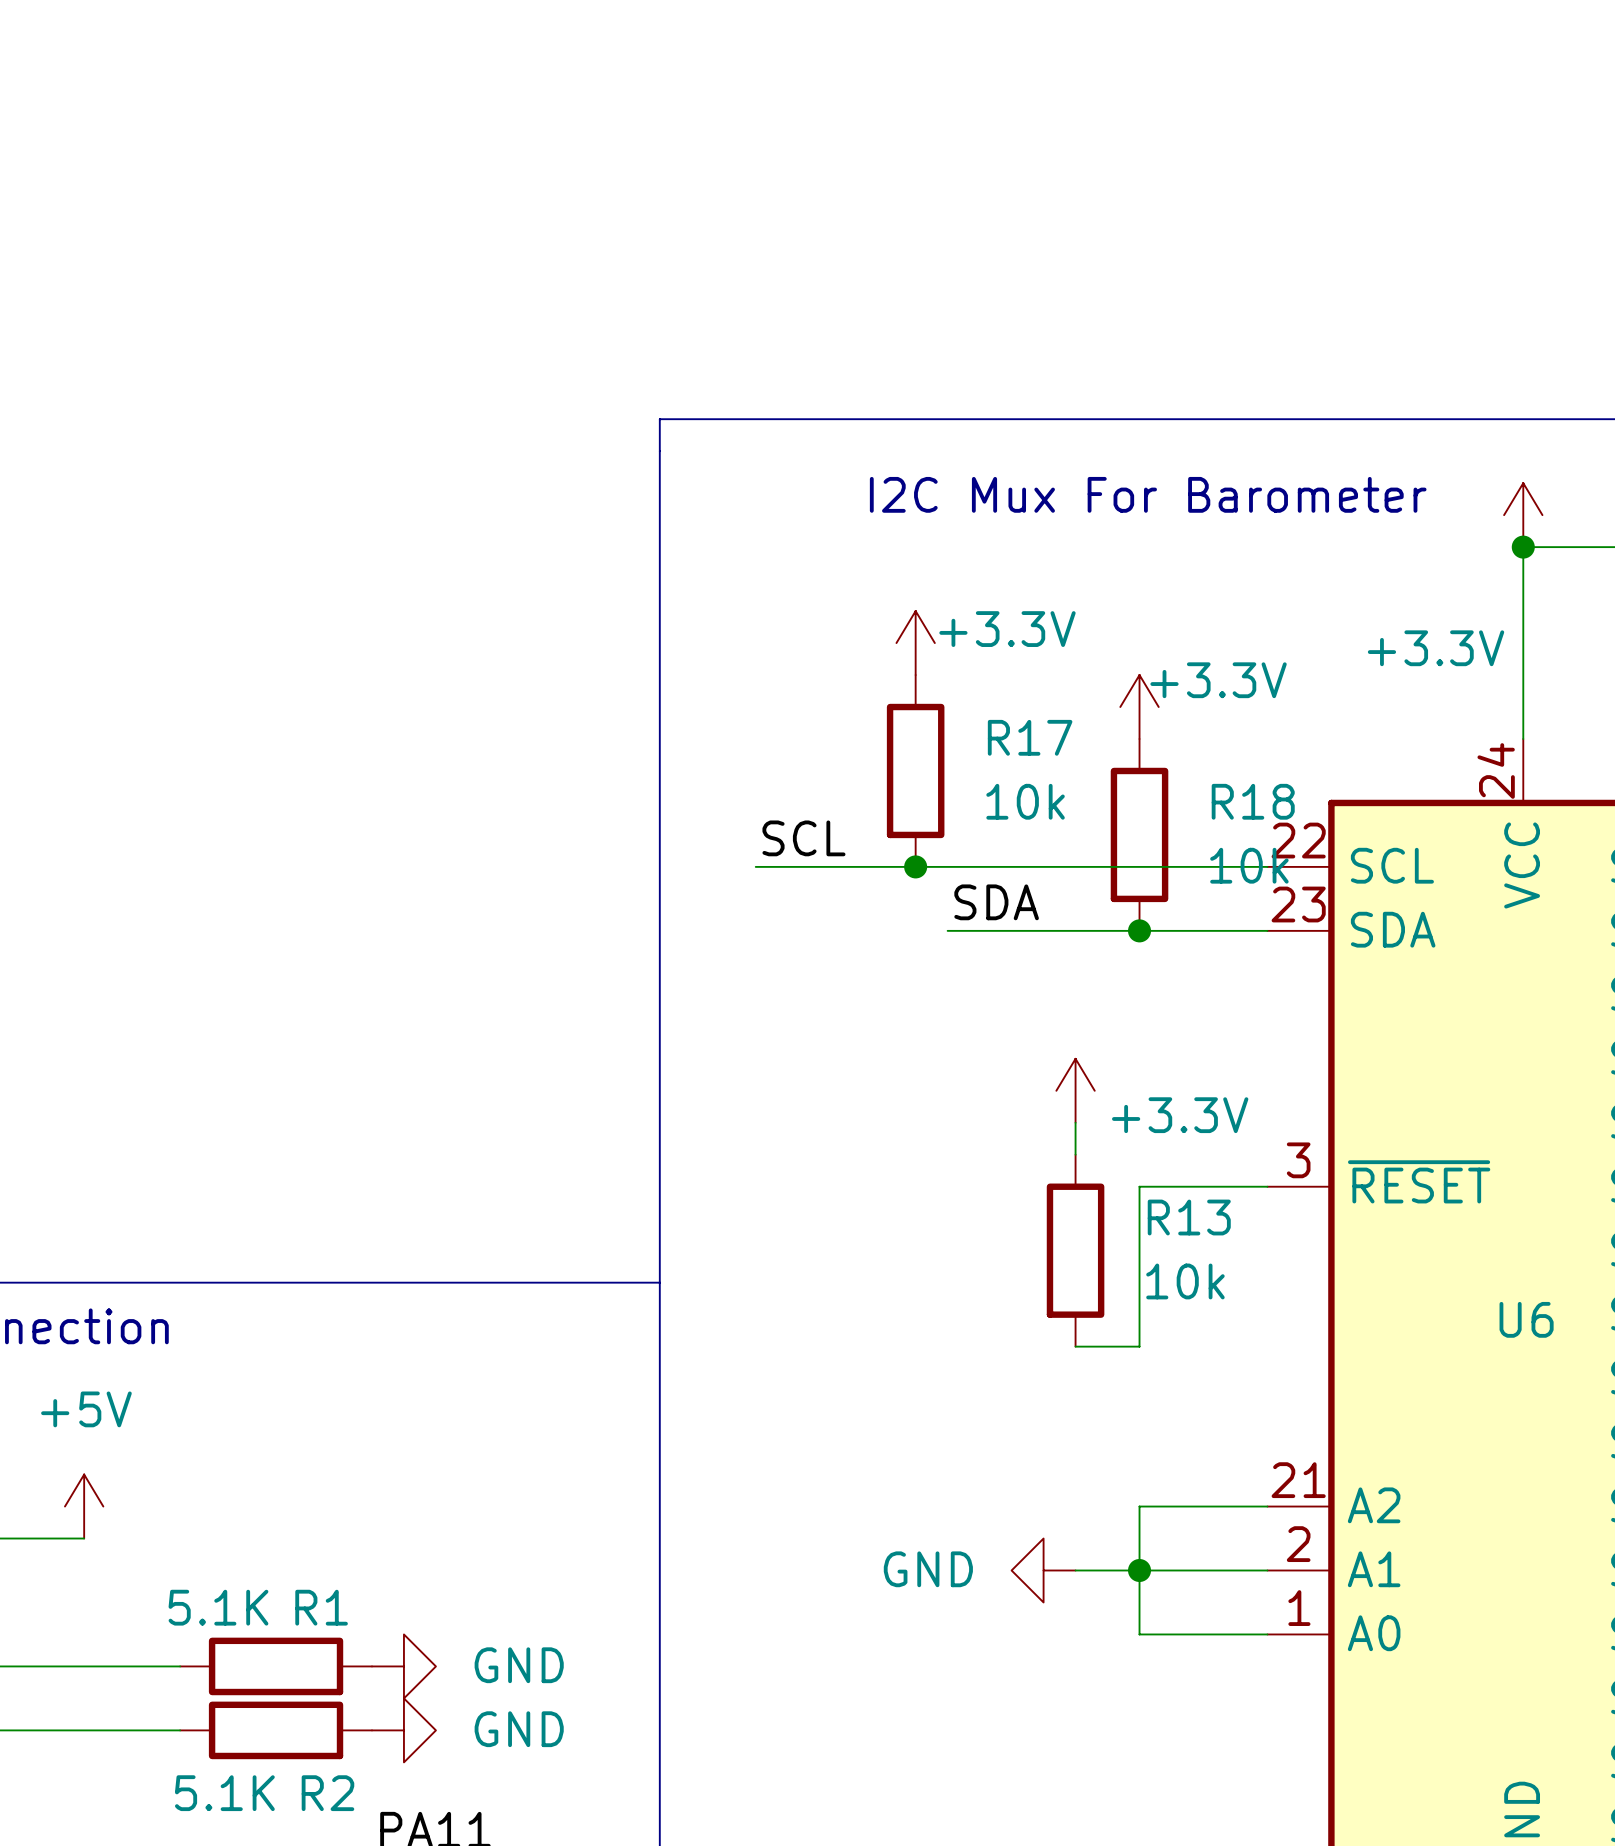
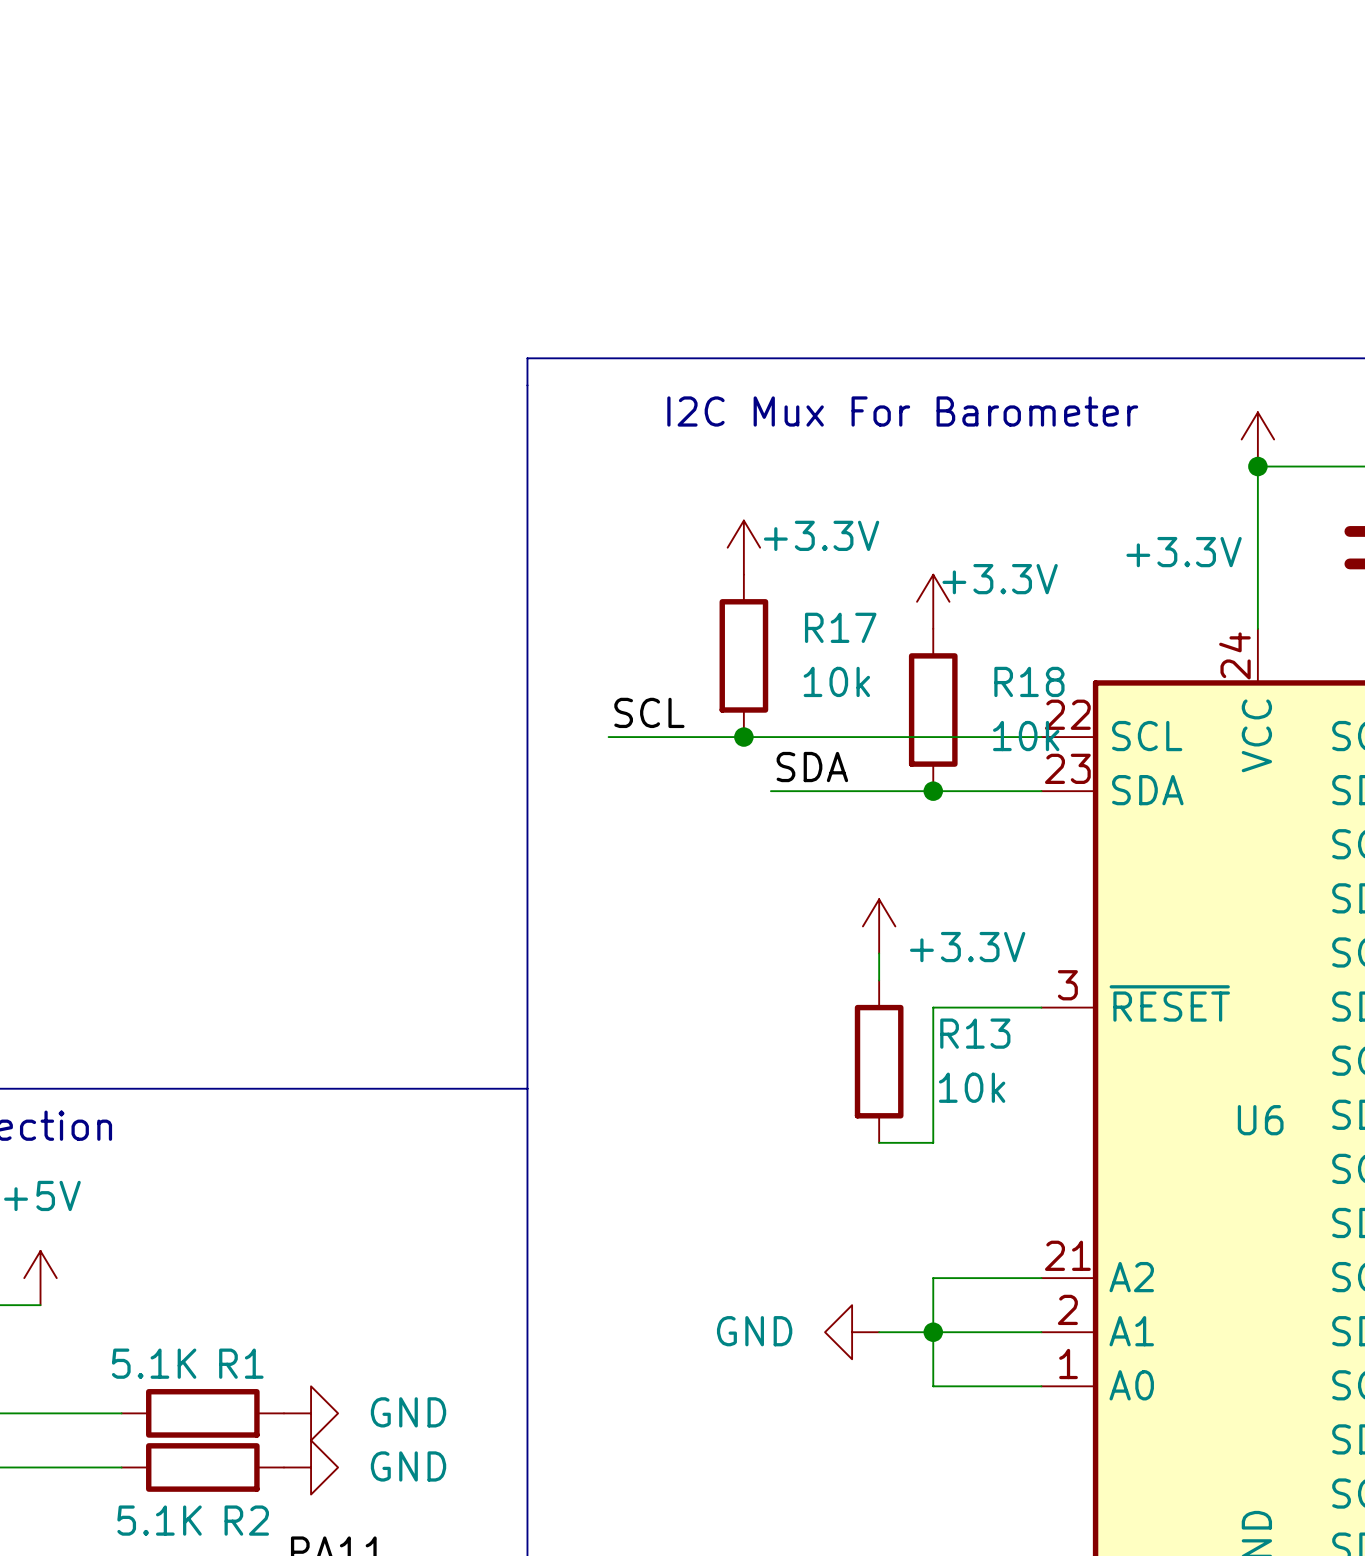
text position: I2C Mux For Barometer (1148, 494) -> I2C Mux For Barometer (902, 411)

